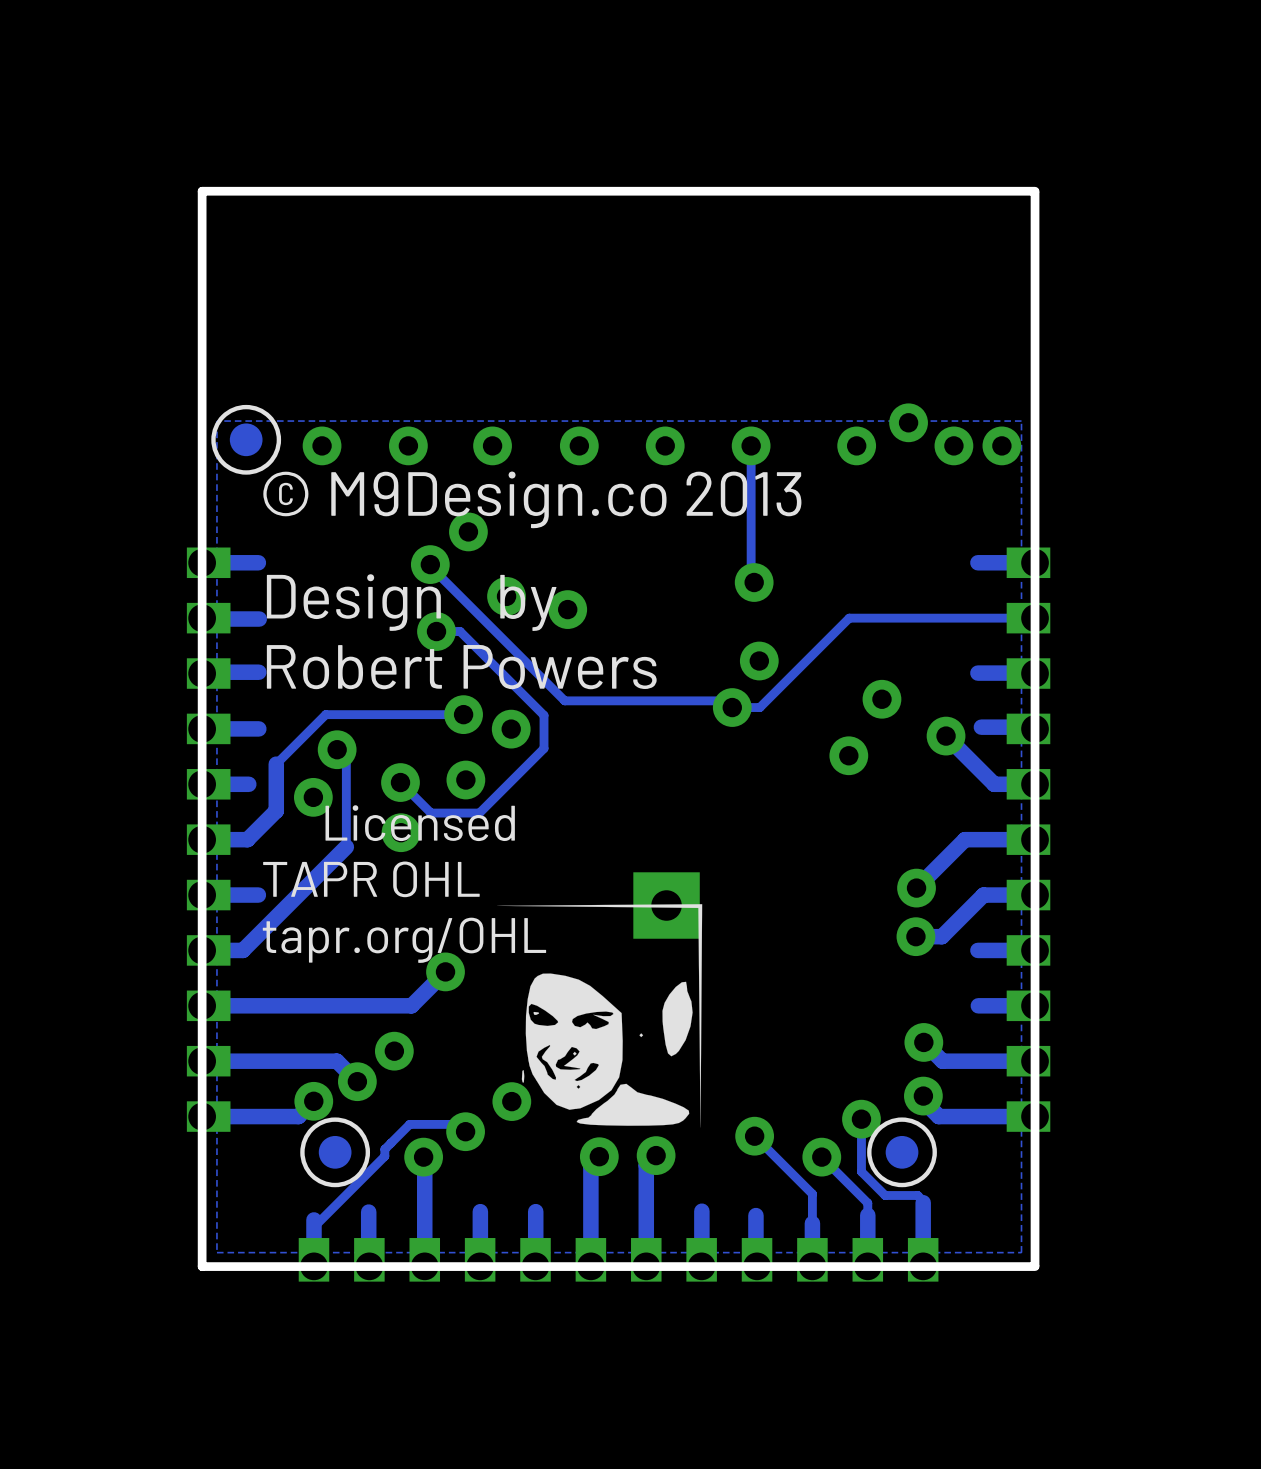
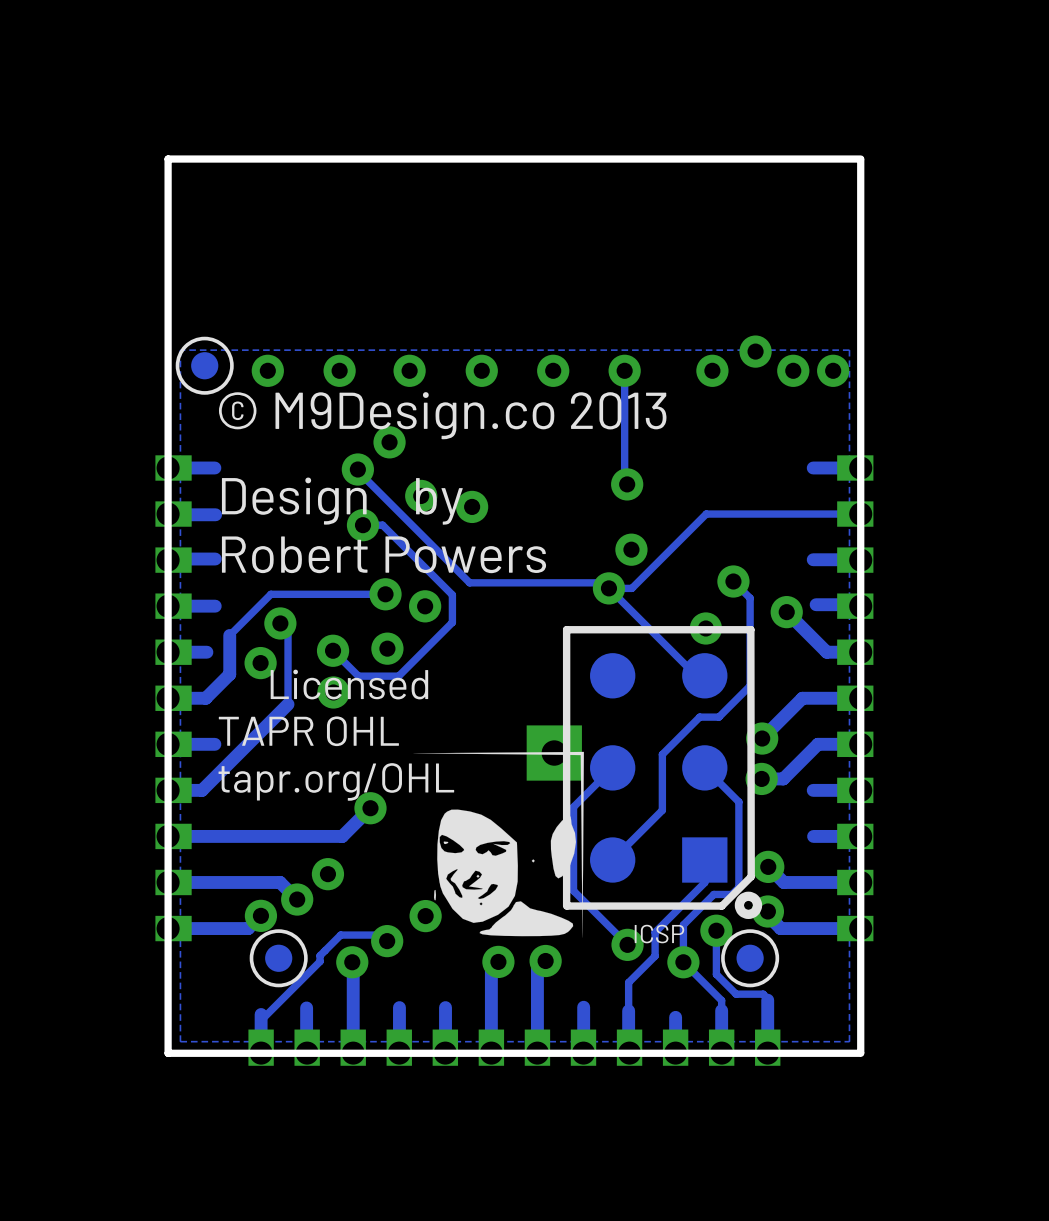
track: none -> (733, 581) (750, 598) (750, 685) (718, 717) (699, 717) (662, 754) (662, 810) (612, 860)
track: none -> (608, 588) (696, 675) (704, 675)
track: none -> (704, 767) (738, 801) (738, 887) (731, 894) (713, 894) (683, 924) (683, 962)
part: none -> (662, 772)
track: none -> (704, 860) (704, 882) (655, 932) (655, 956) (628, 982) (628, 1010)
track: (754, 1136) (812, 1193) (812, 1223) -> (627, 944) (573, 890) (573, 807) (612, 767)

